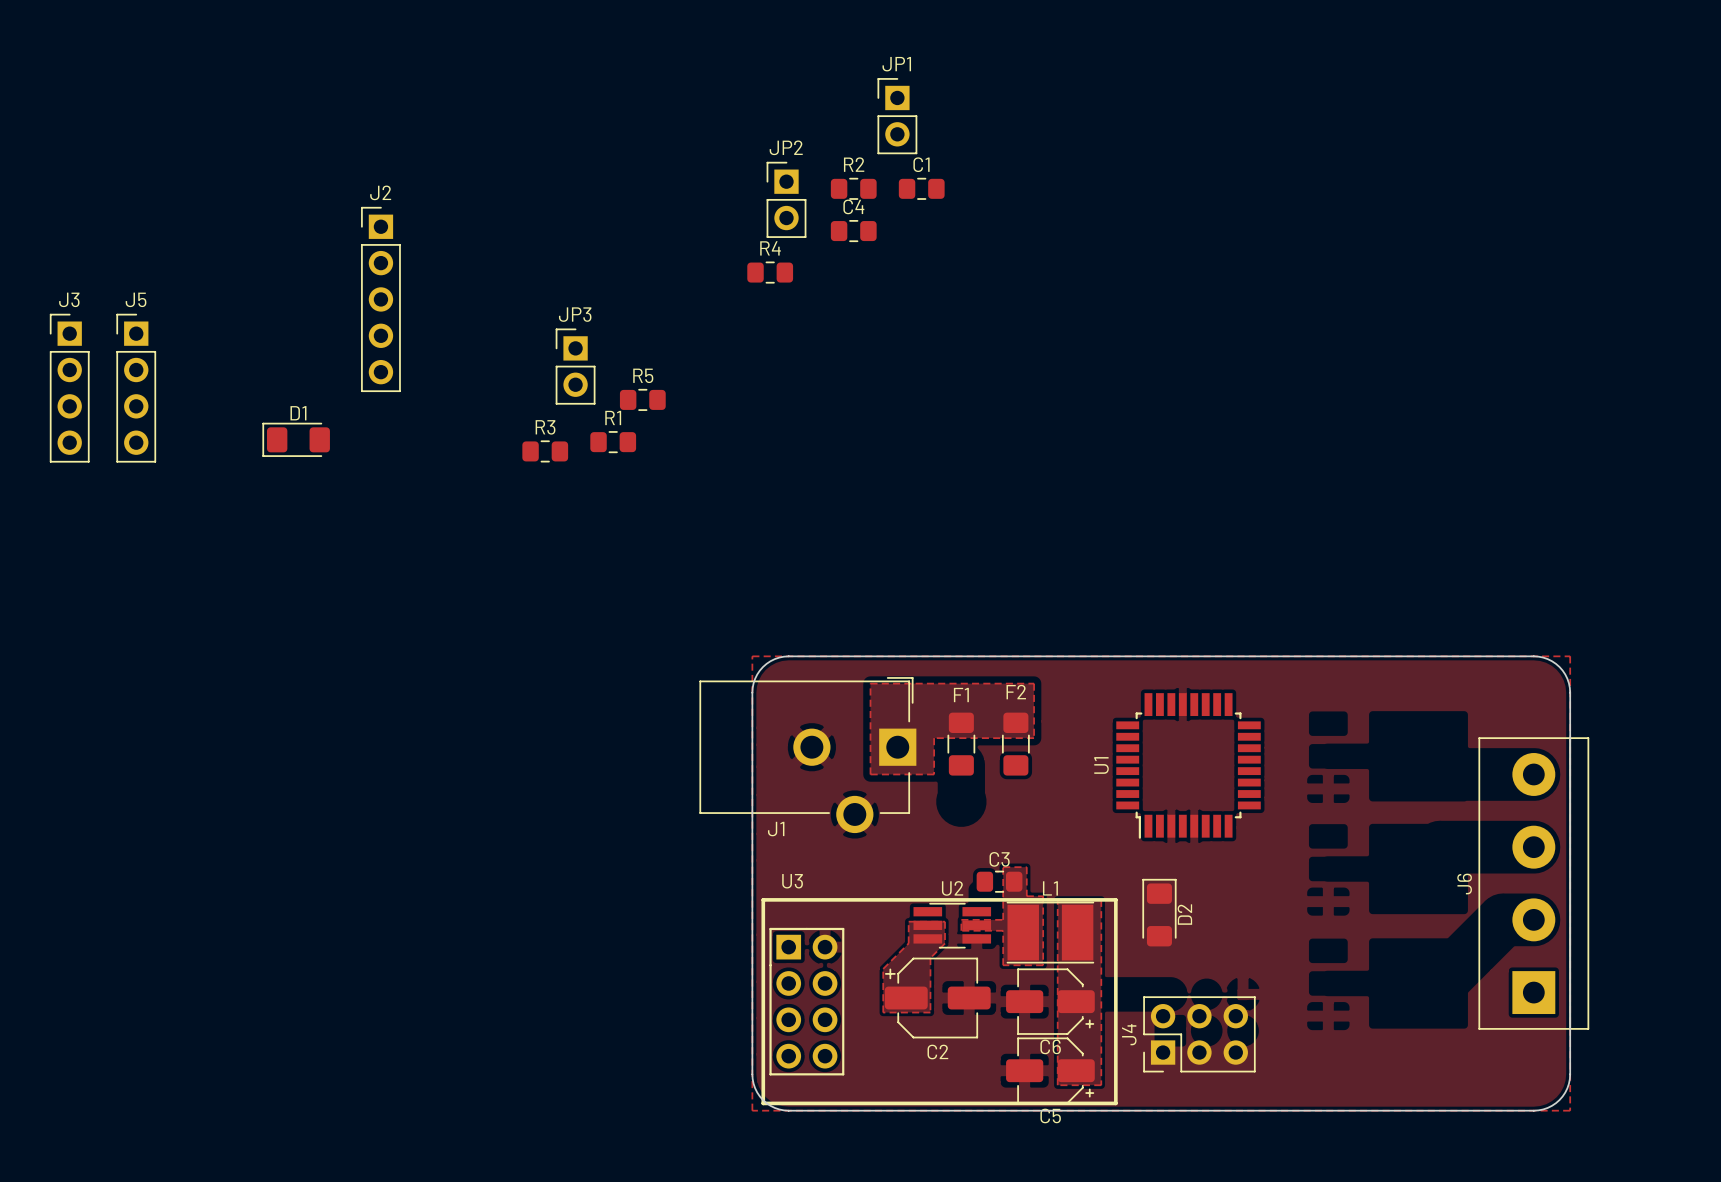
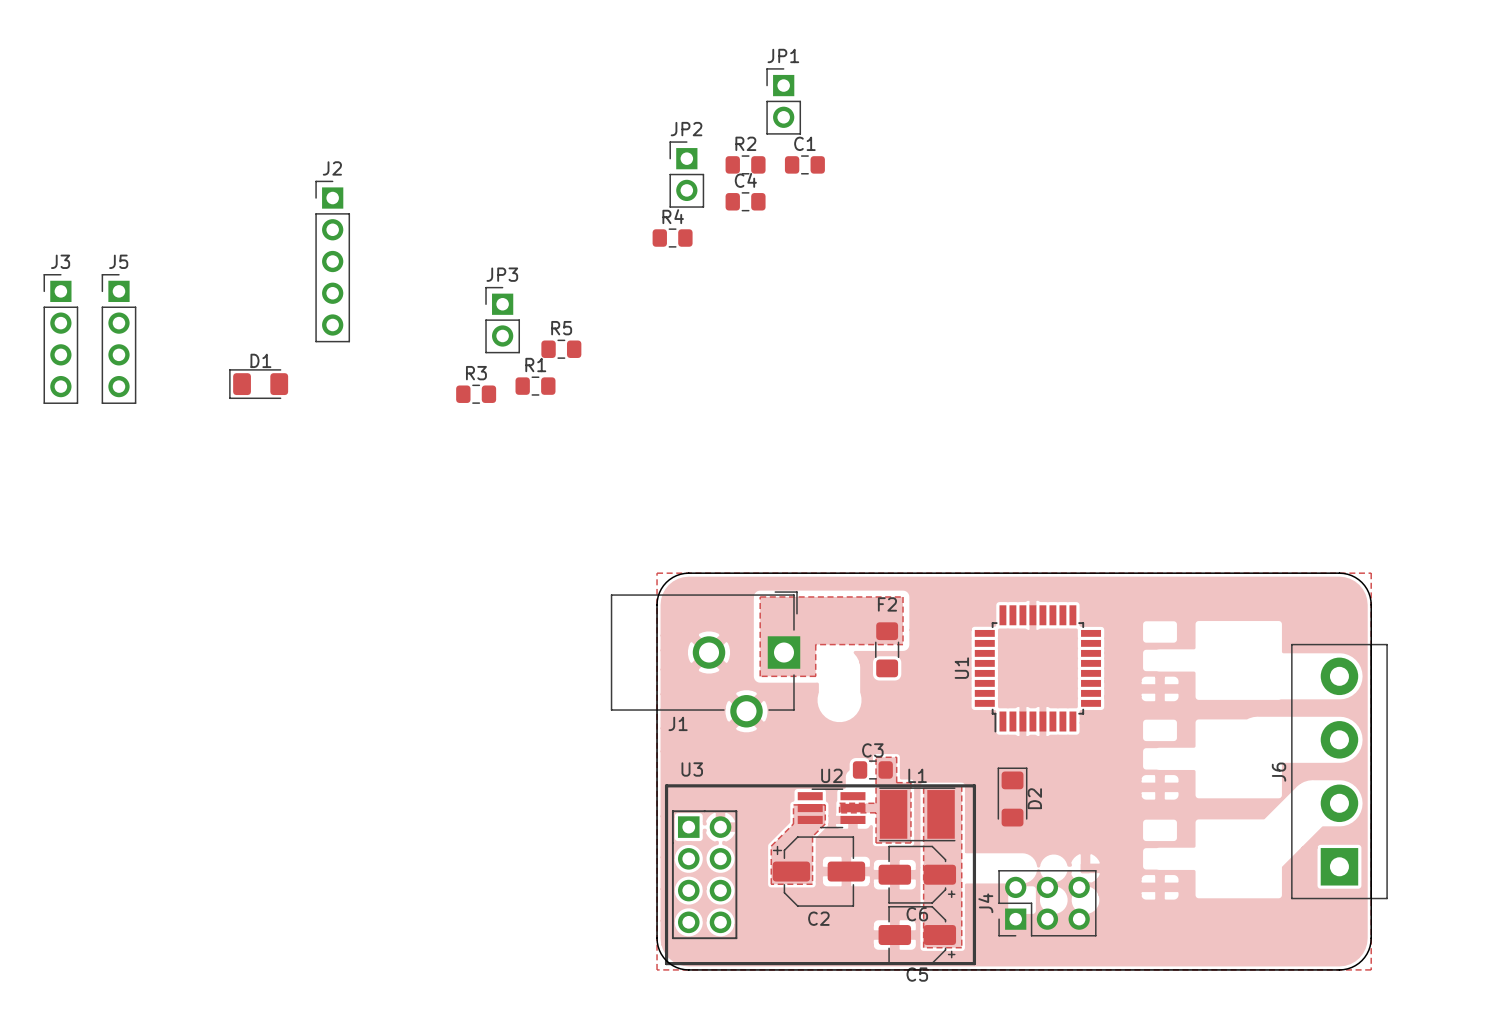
F1: (961, 744) -> none

